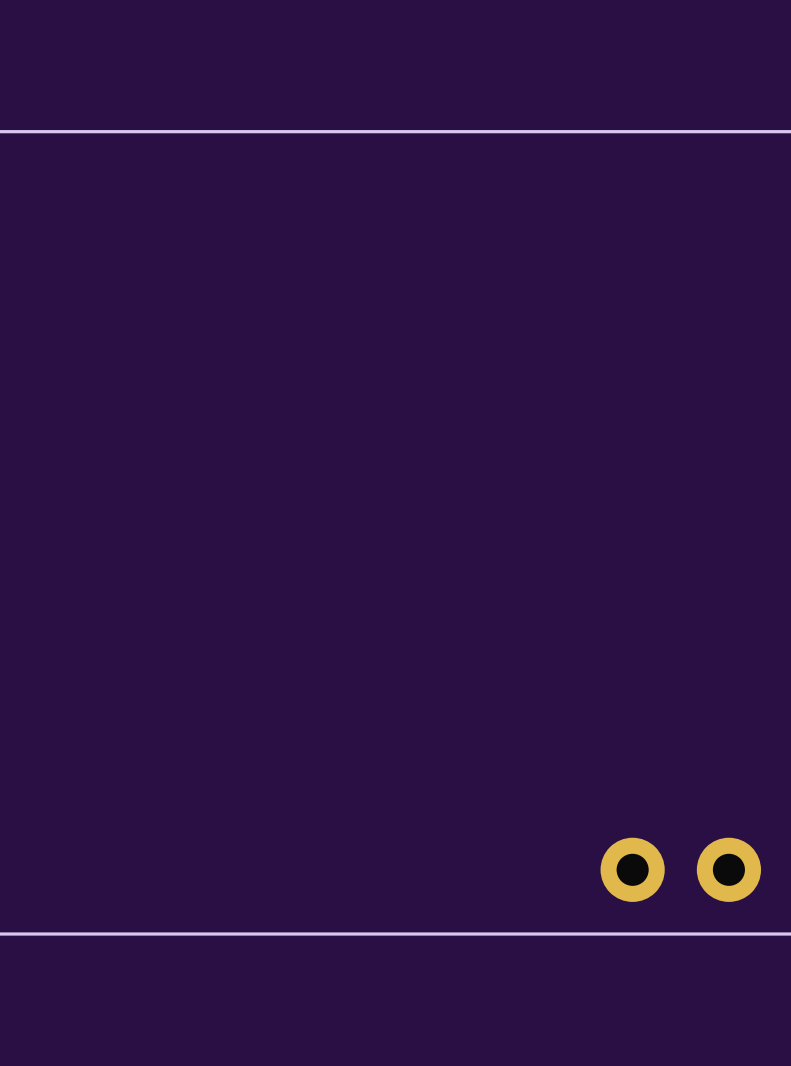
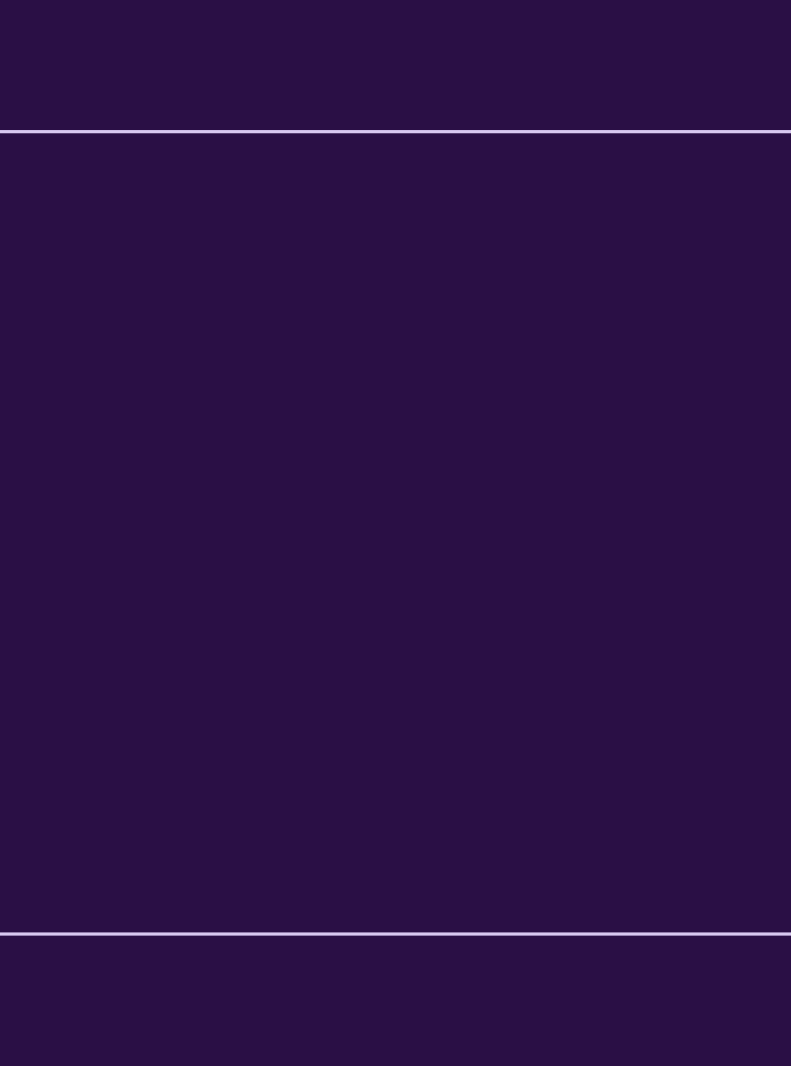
part: (632, 869) -> none
part: (728, 869) -> none

